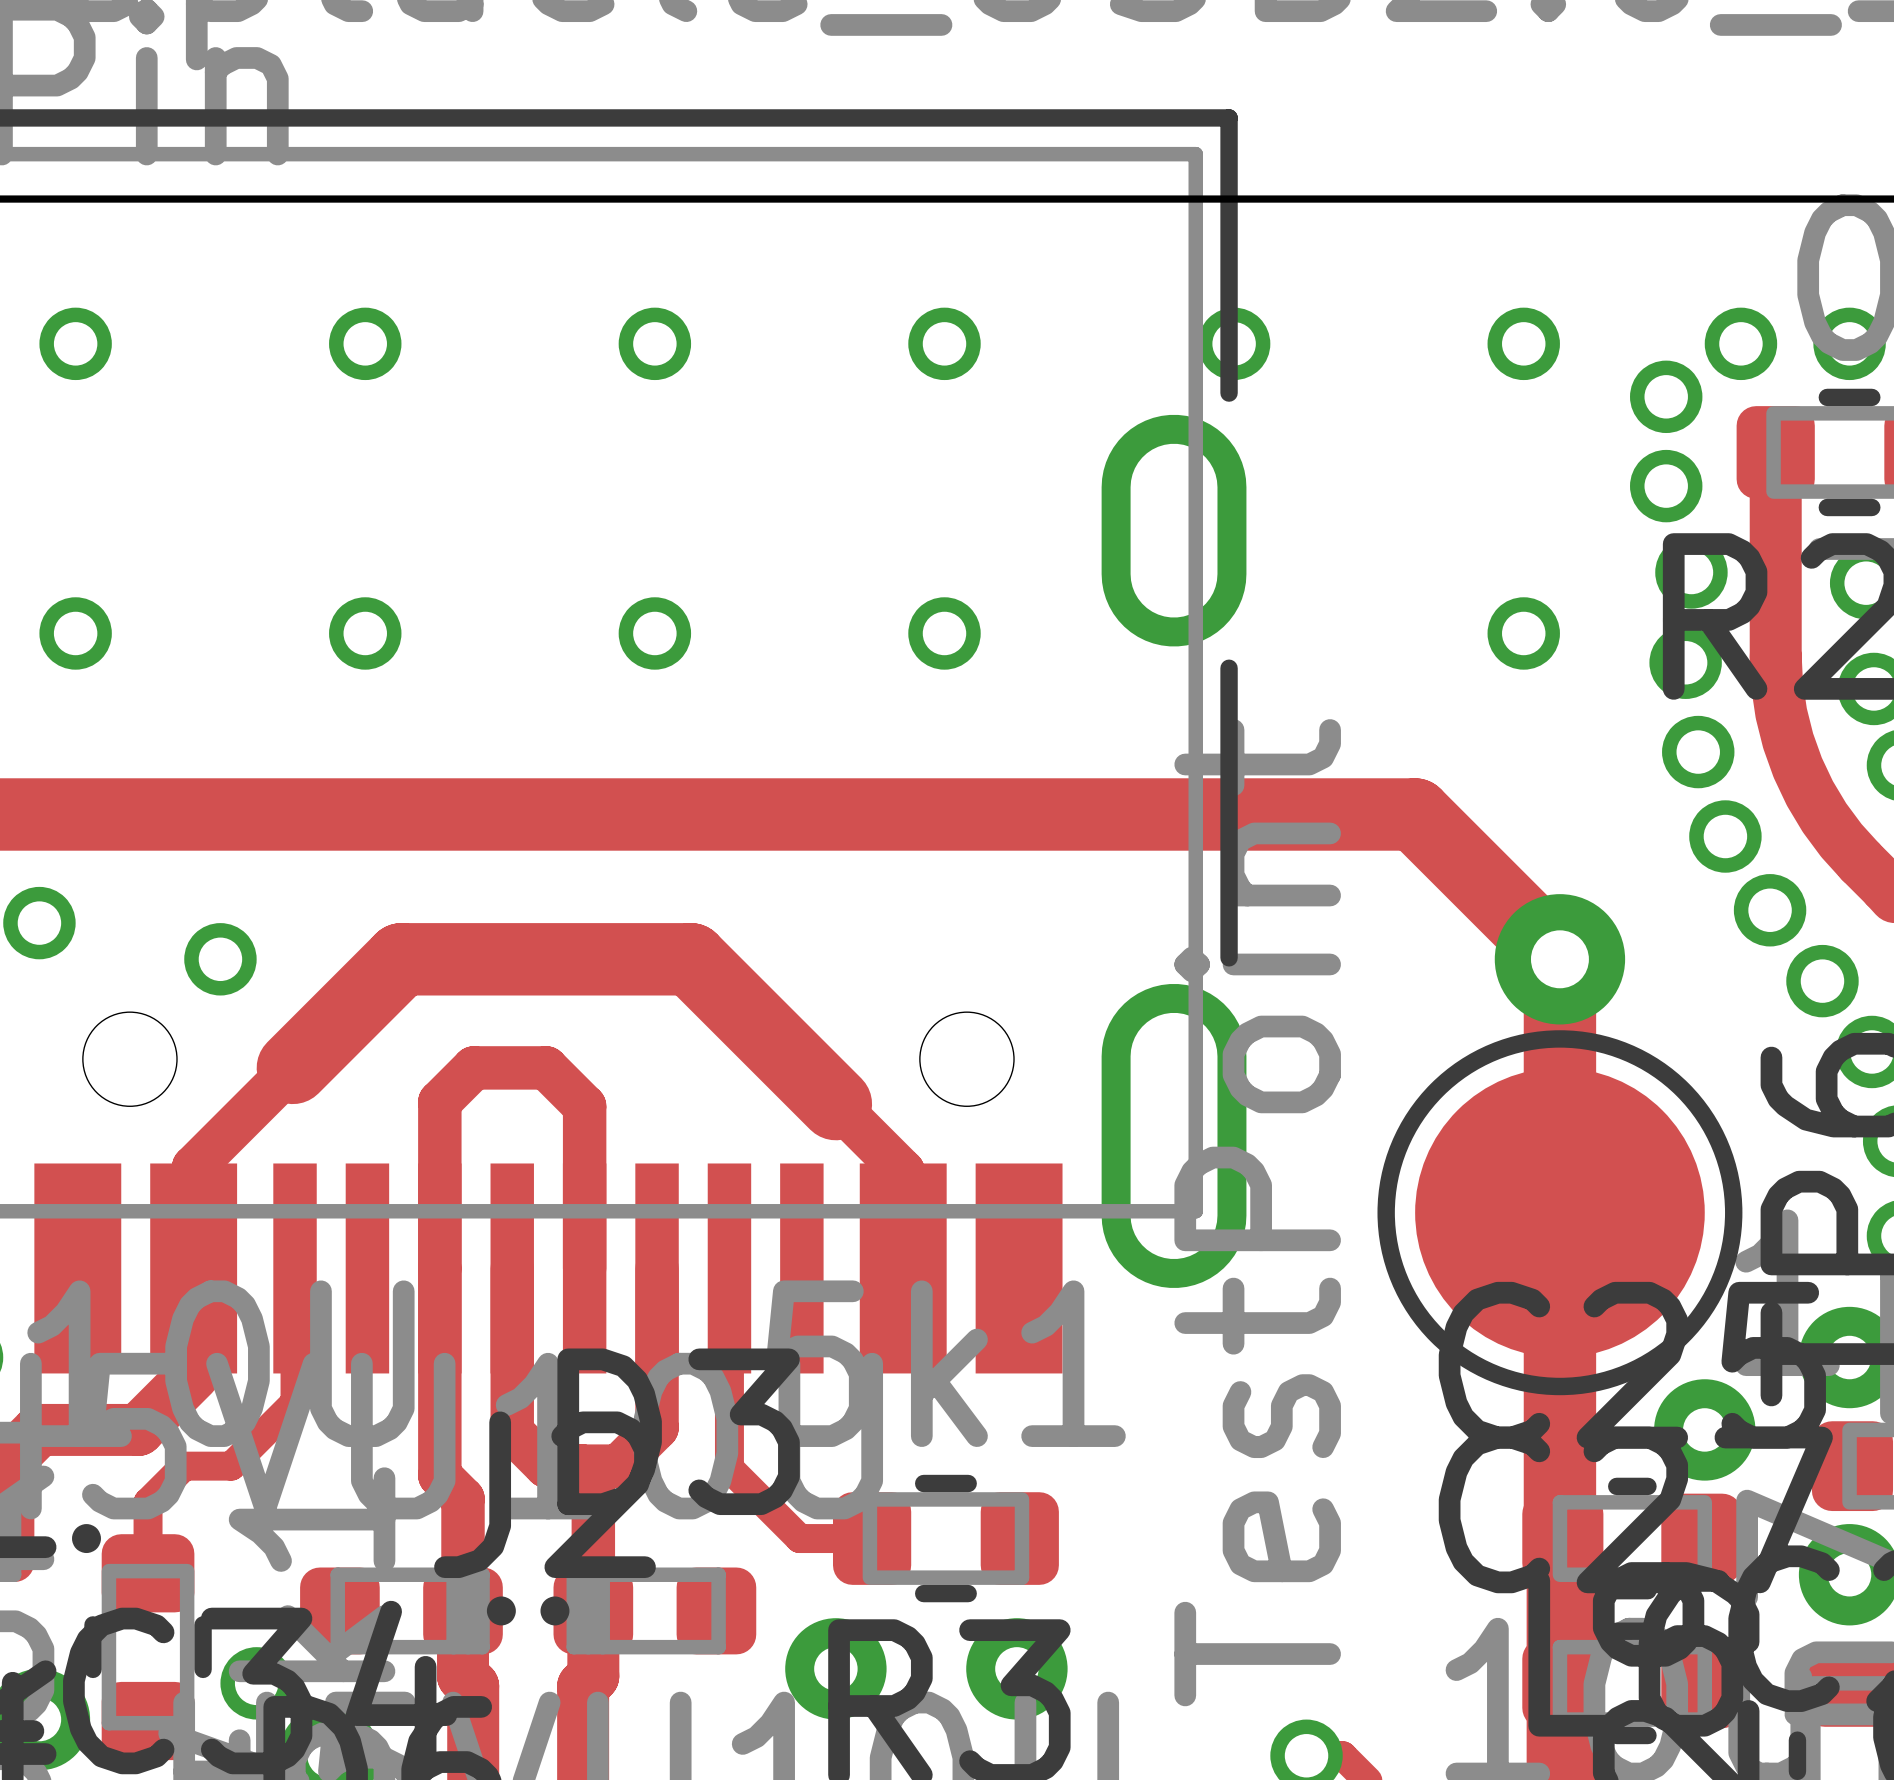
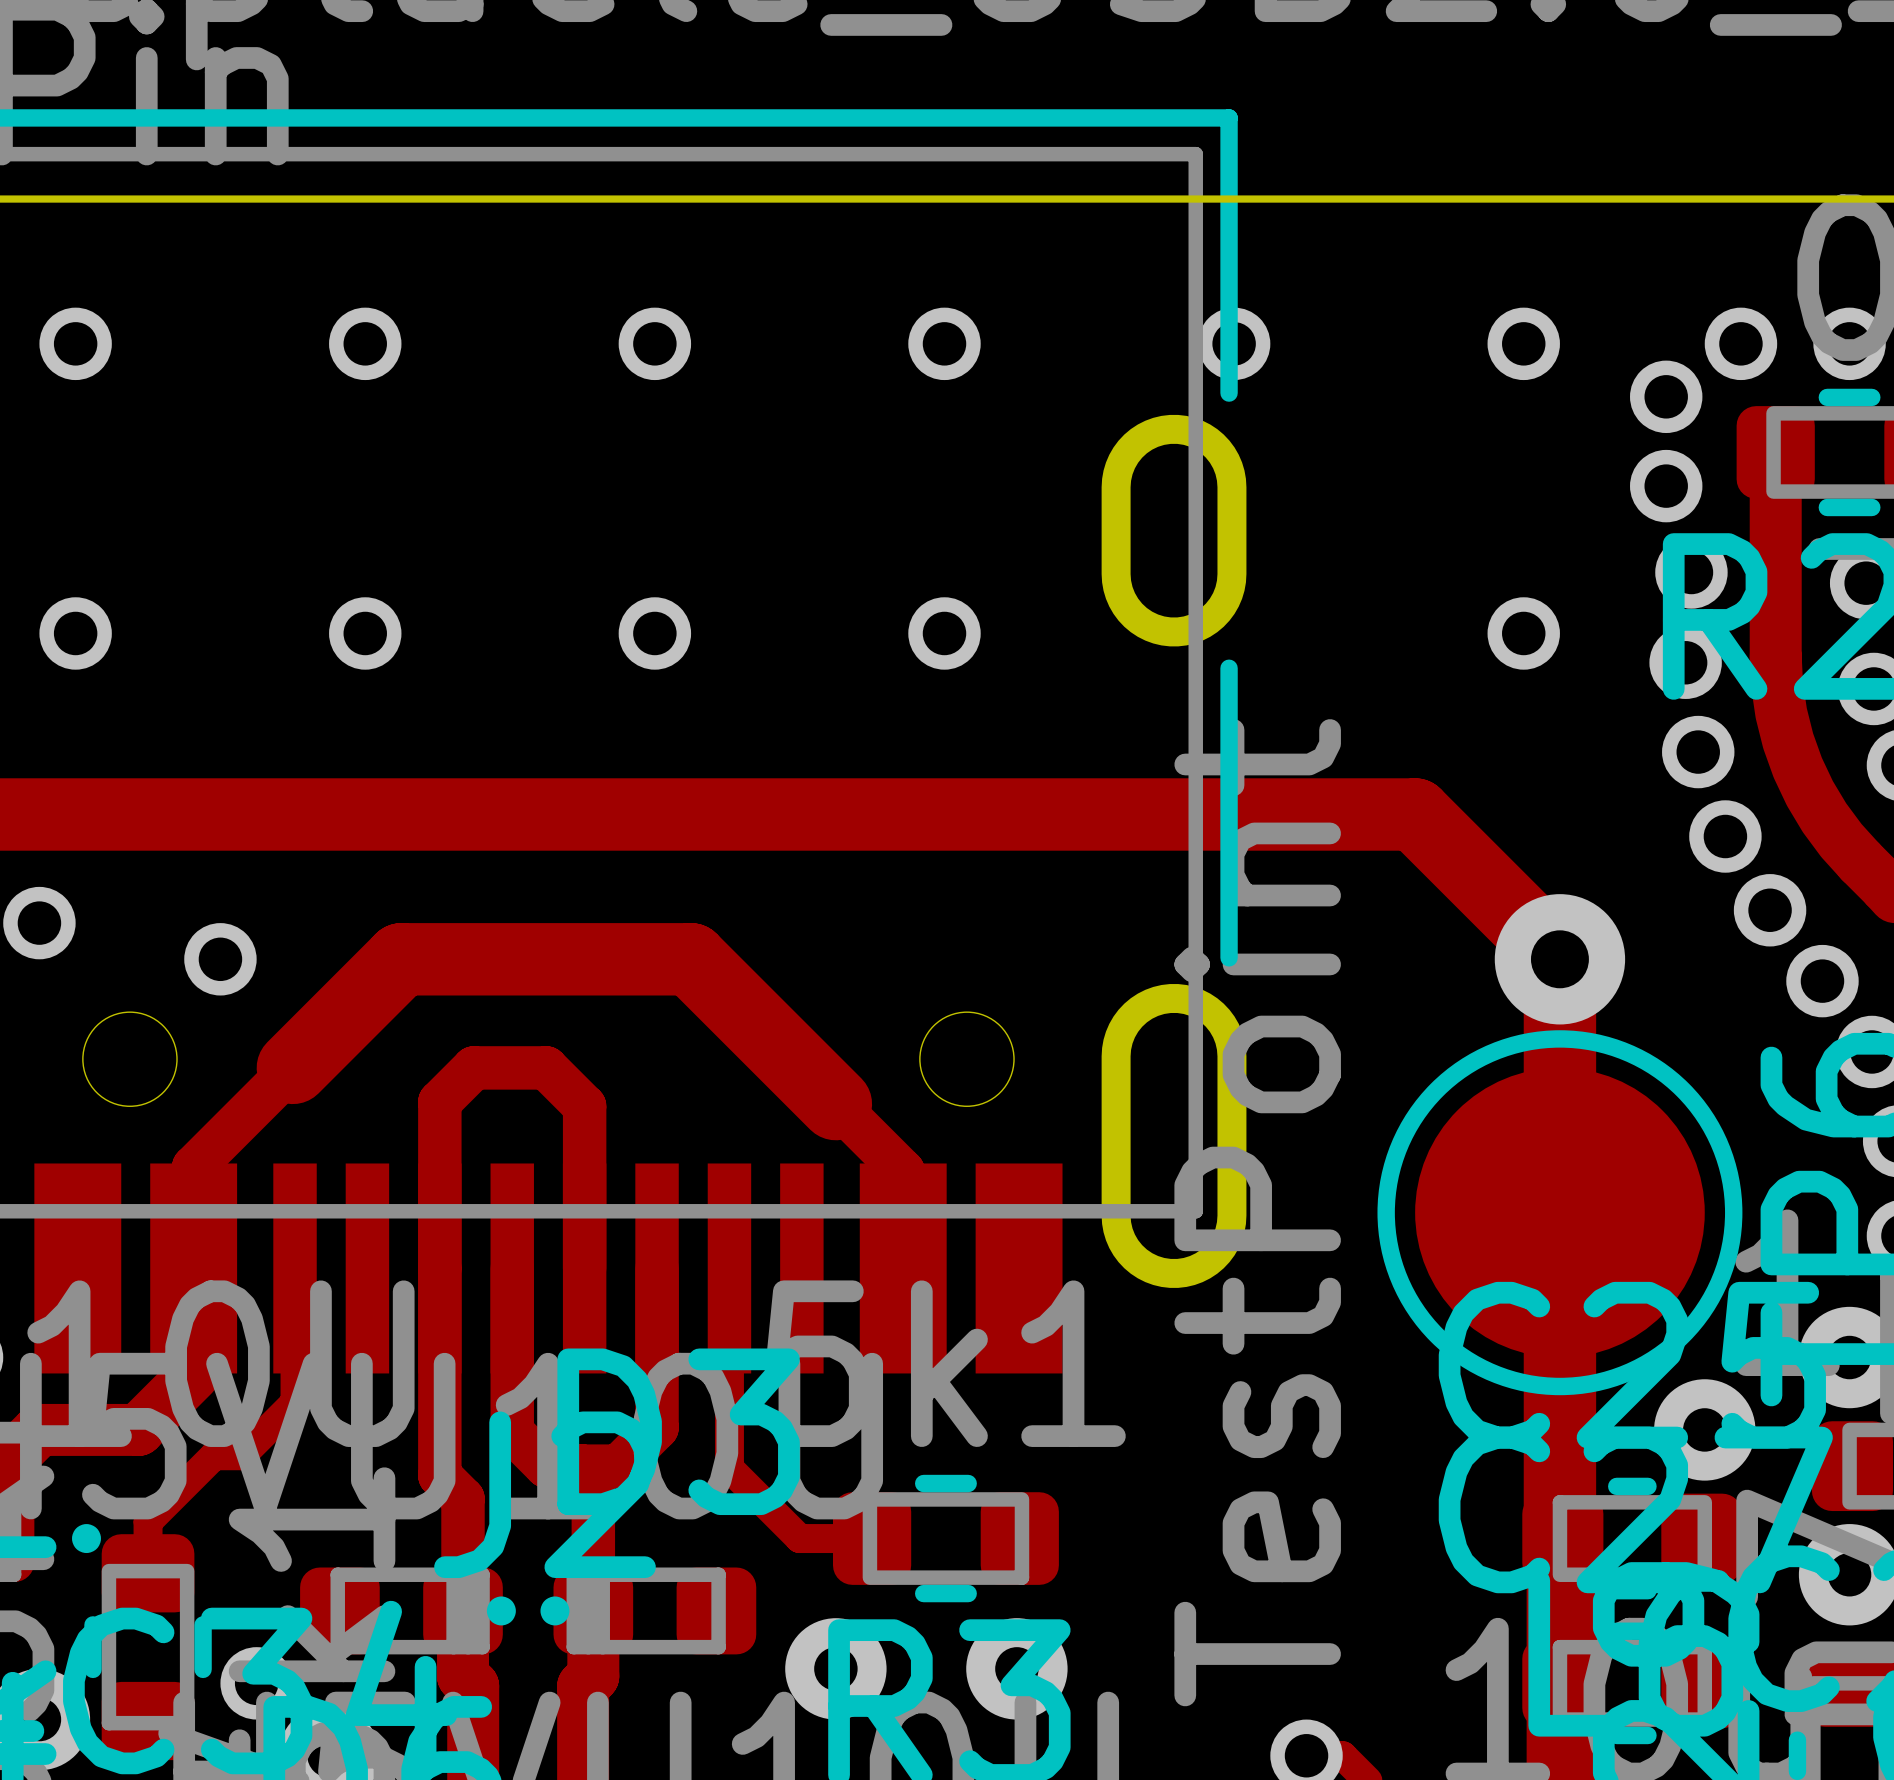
track: (241, 1455) (231, 1466) (184, 1466) (148, 1502) (148, 1521) -> (241, 1455) (214, 1455) (148, 1521)

